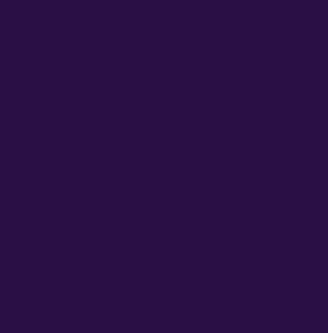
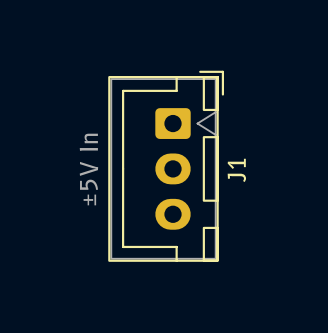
J1: none -> ±5V In (166, 166)

